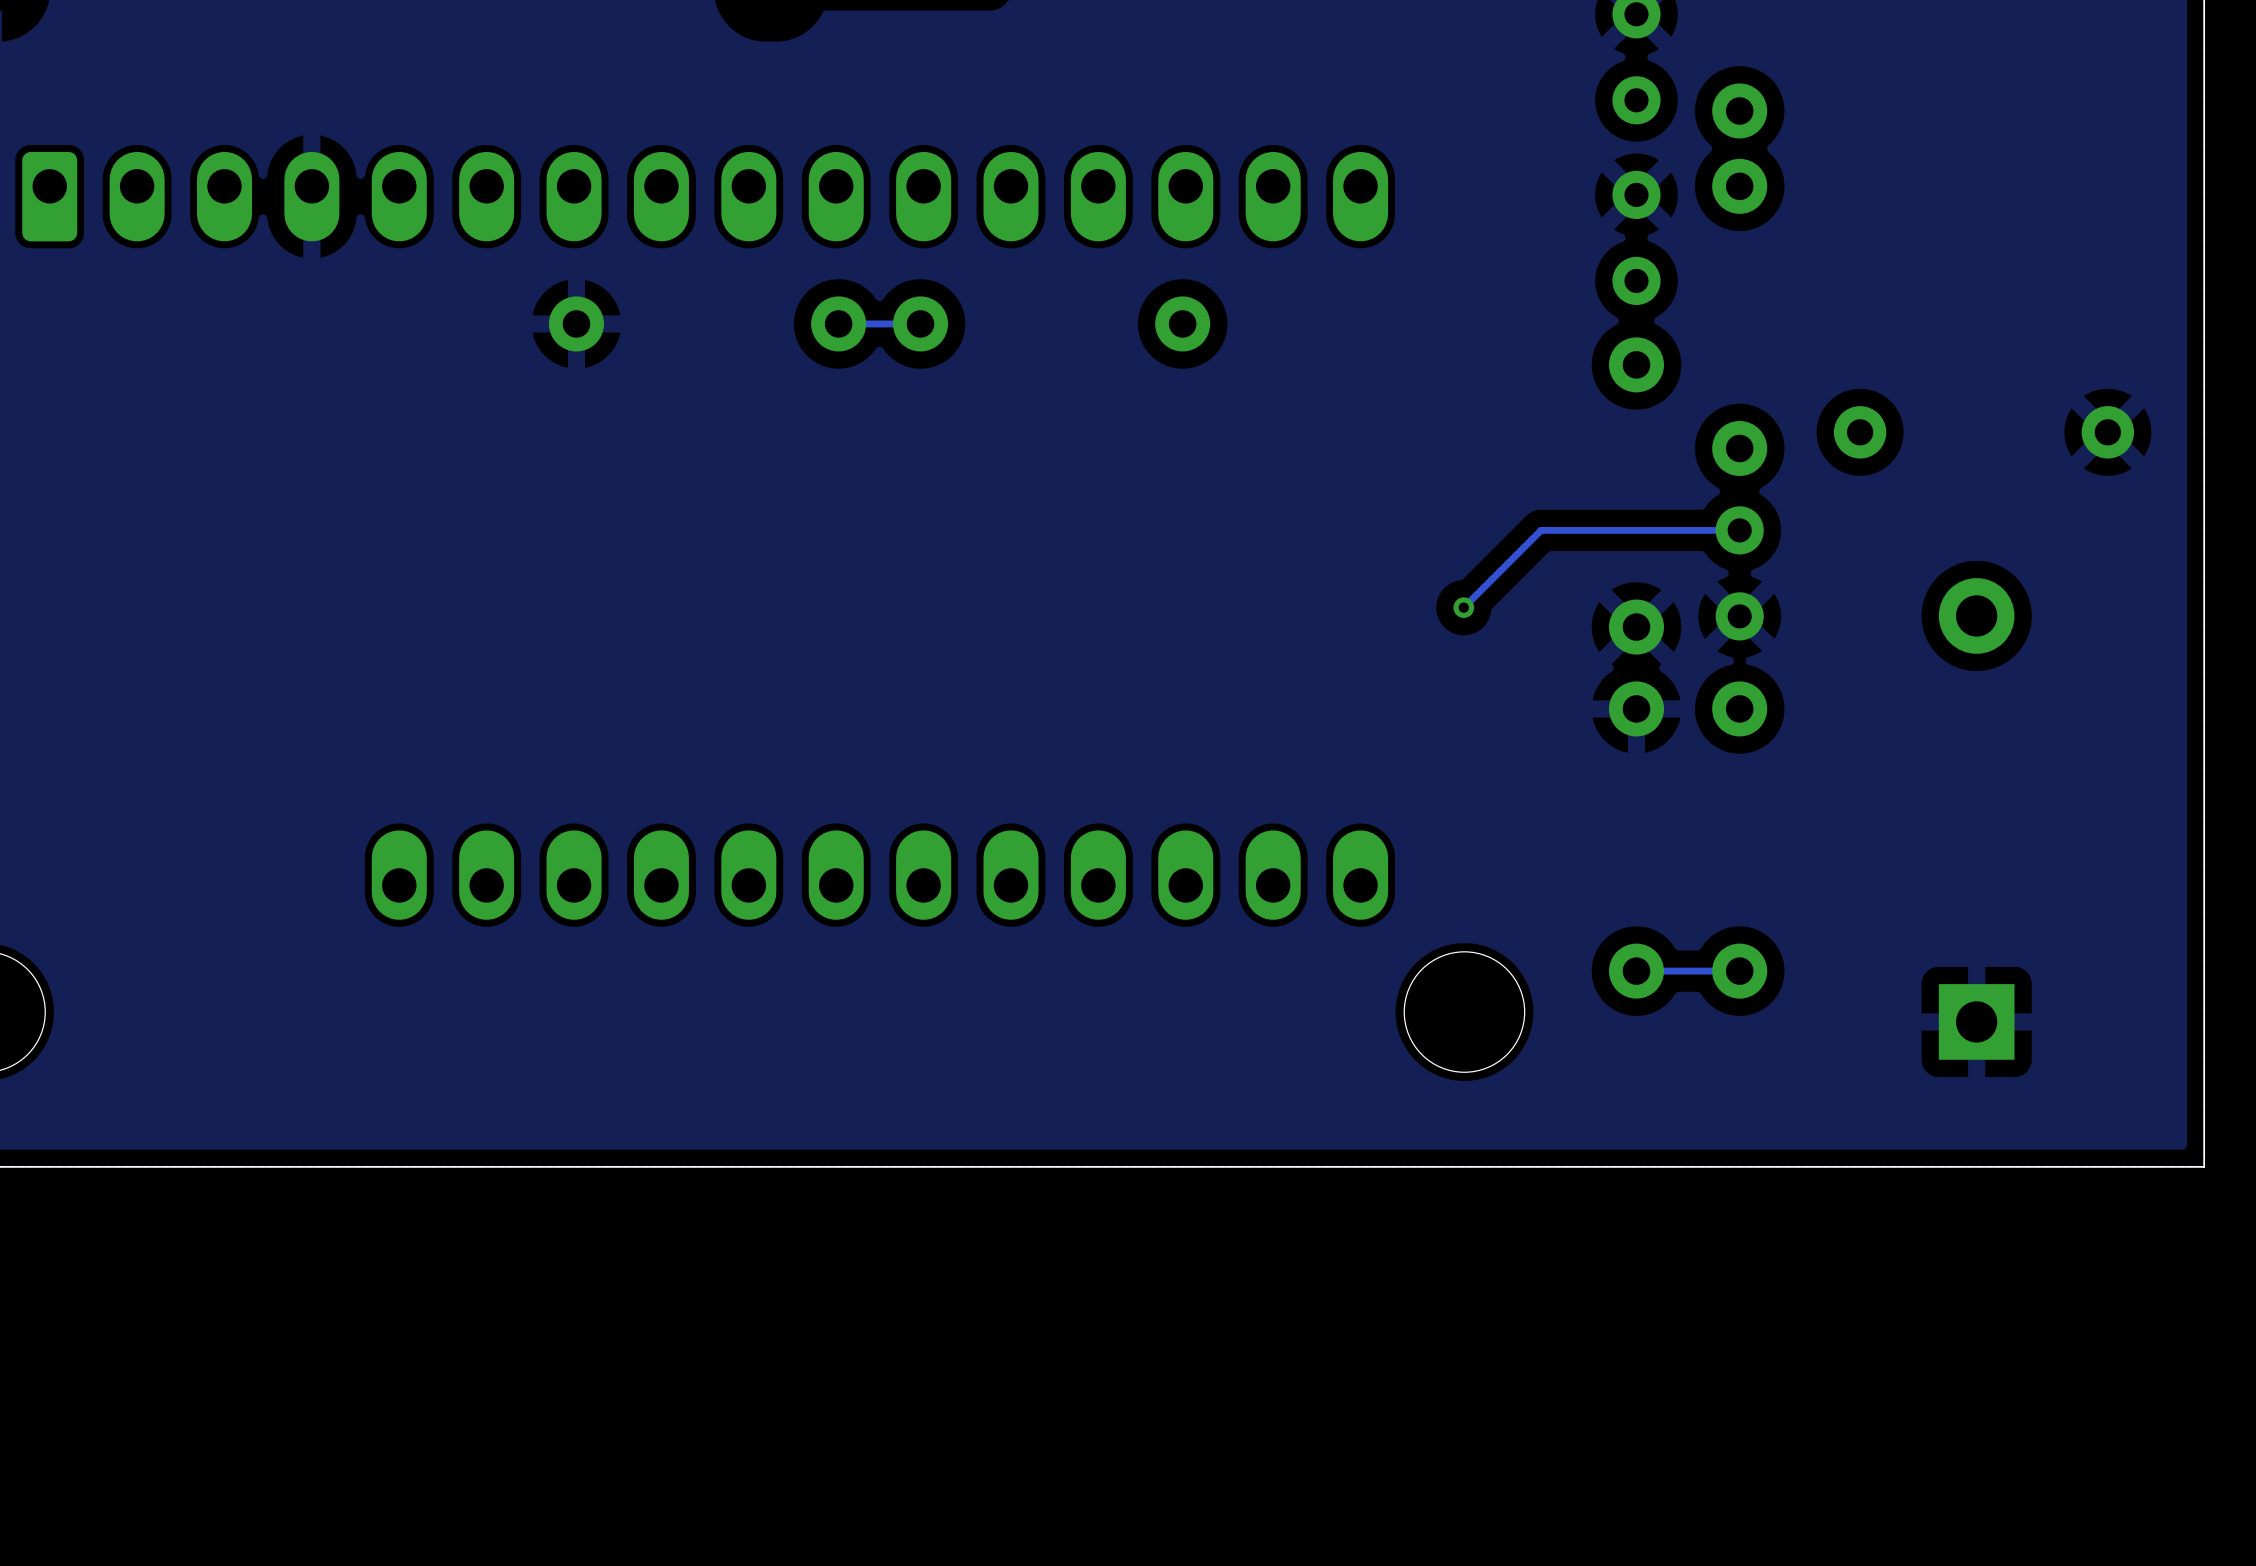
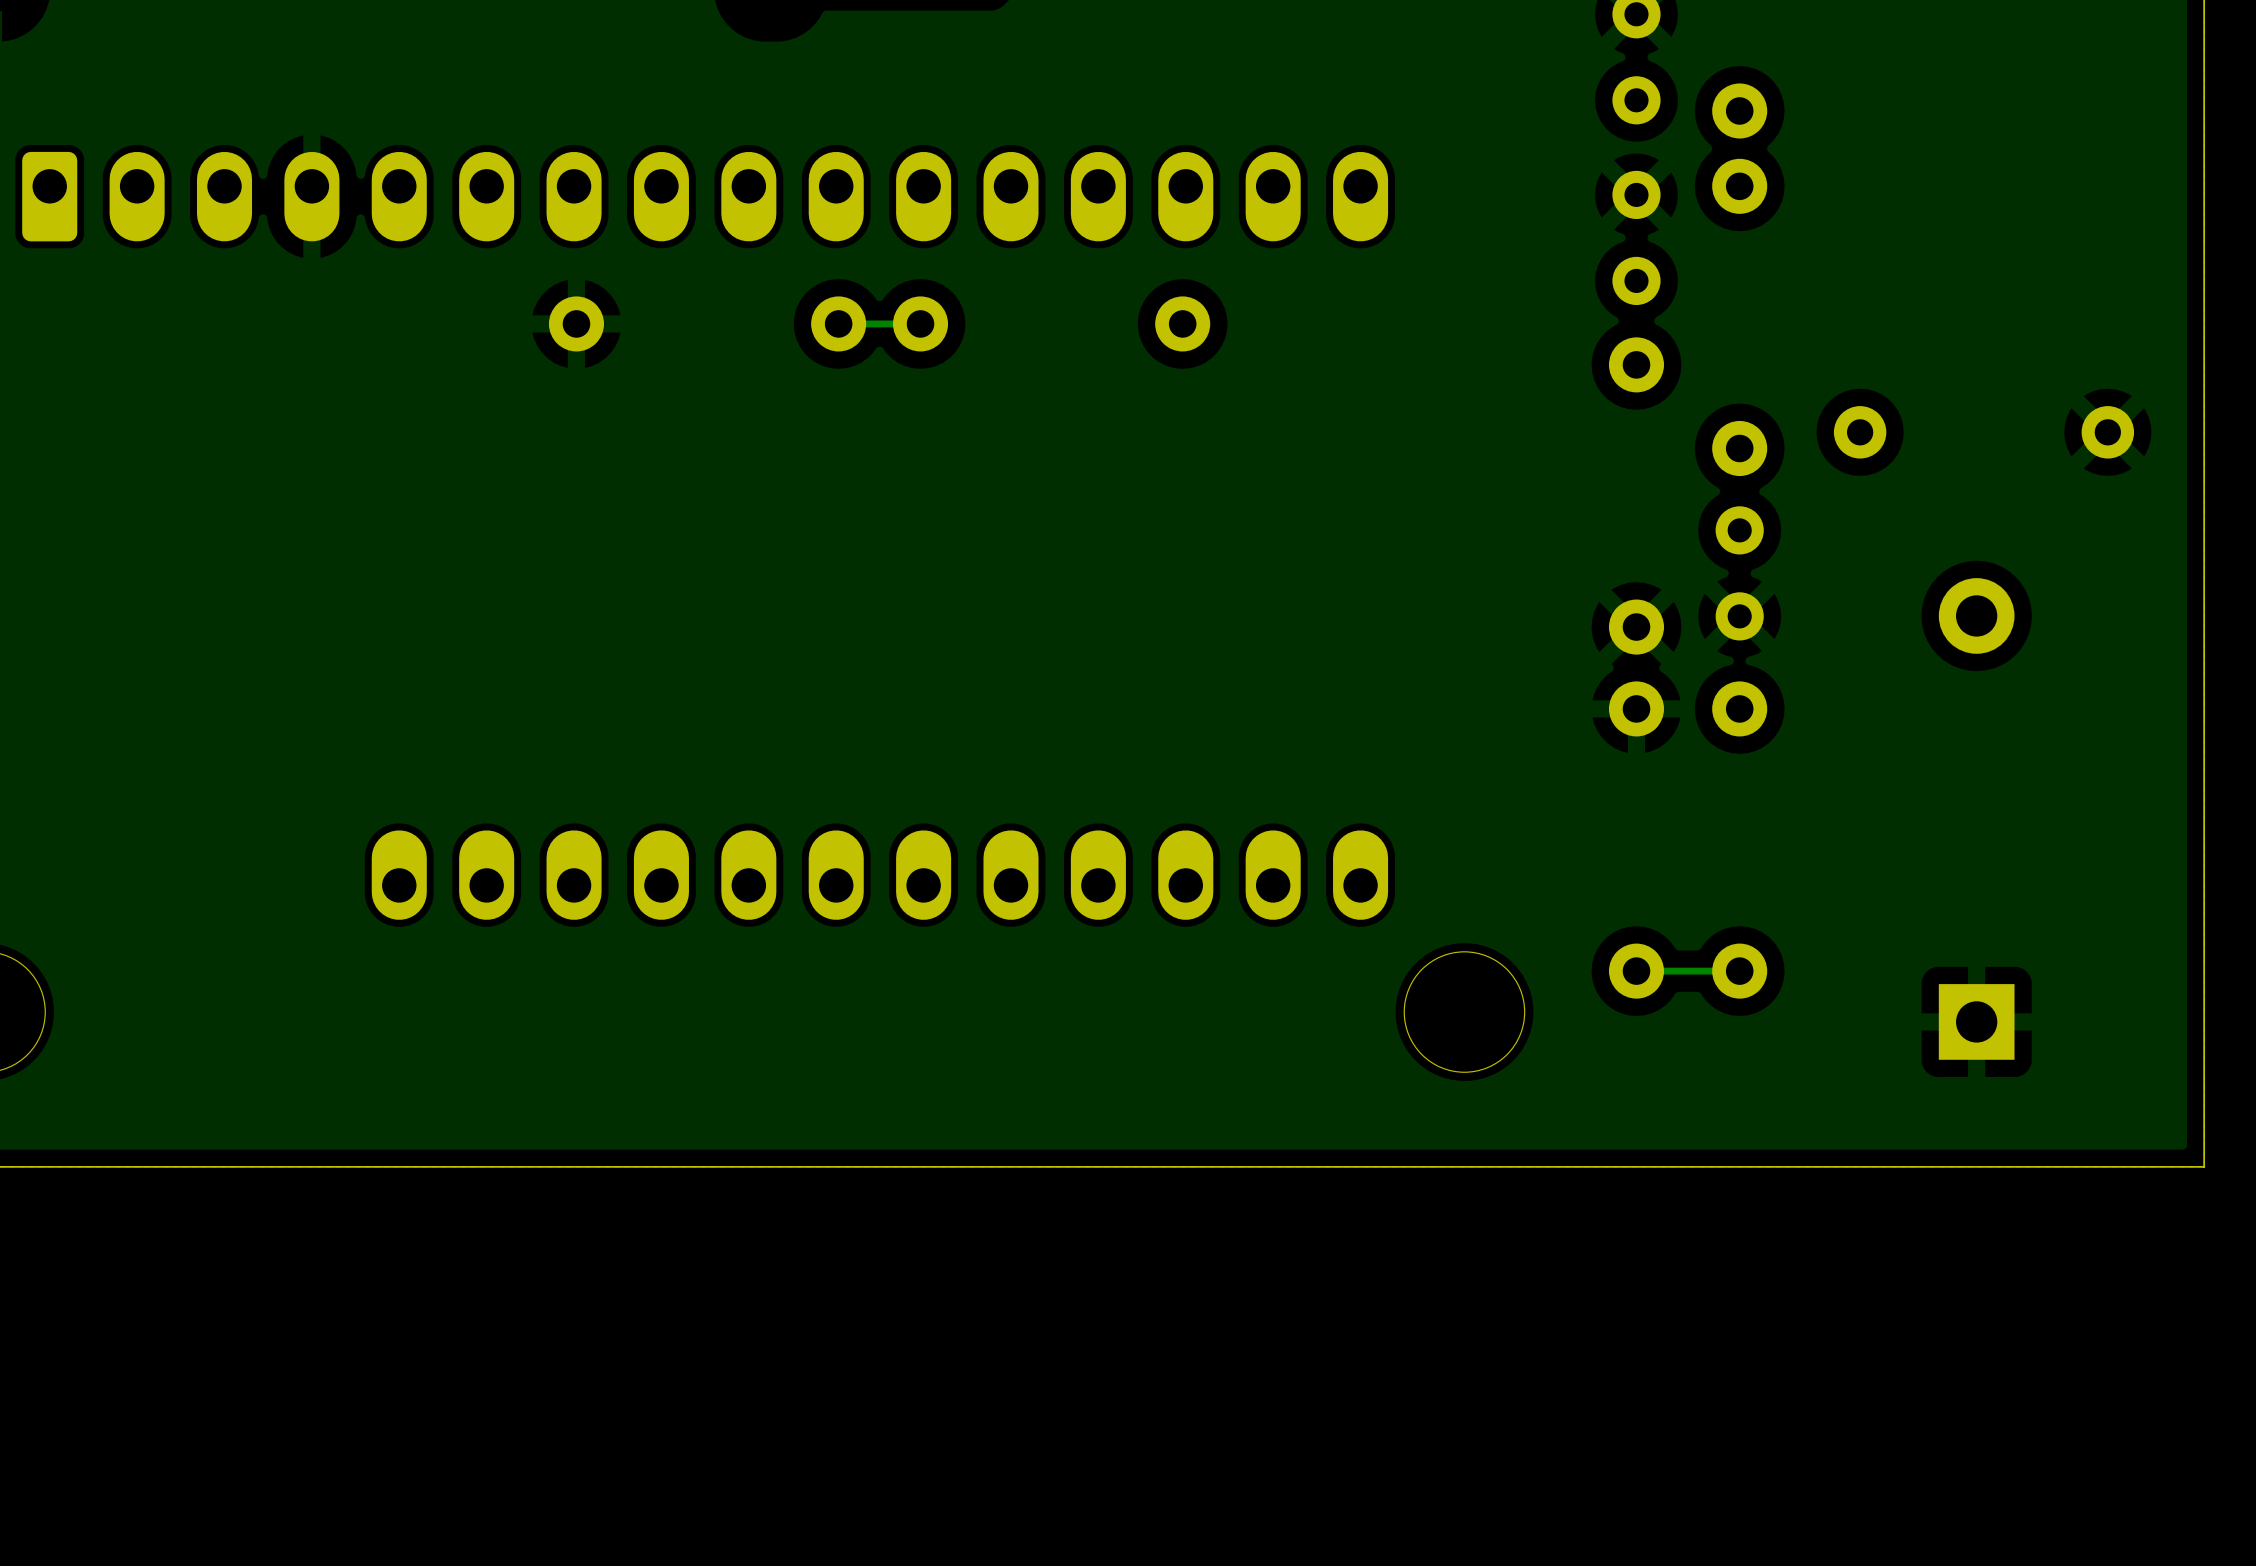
track: (1739, 530) (1541, 530) (1463, 607) -> none
via: (1463, 607) -> none

